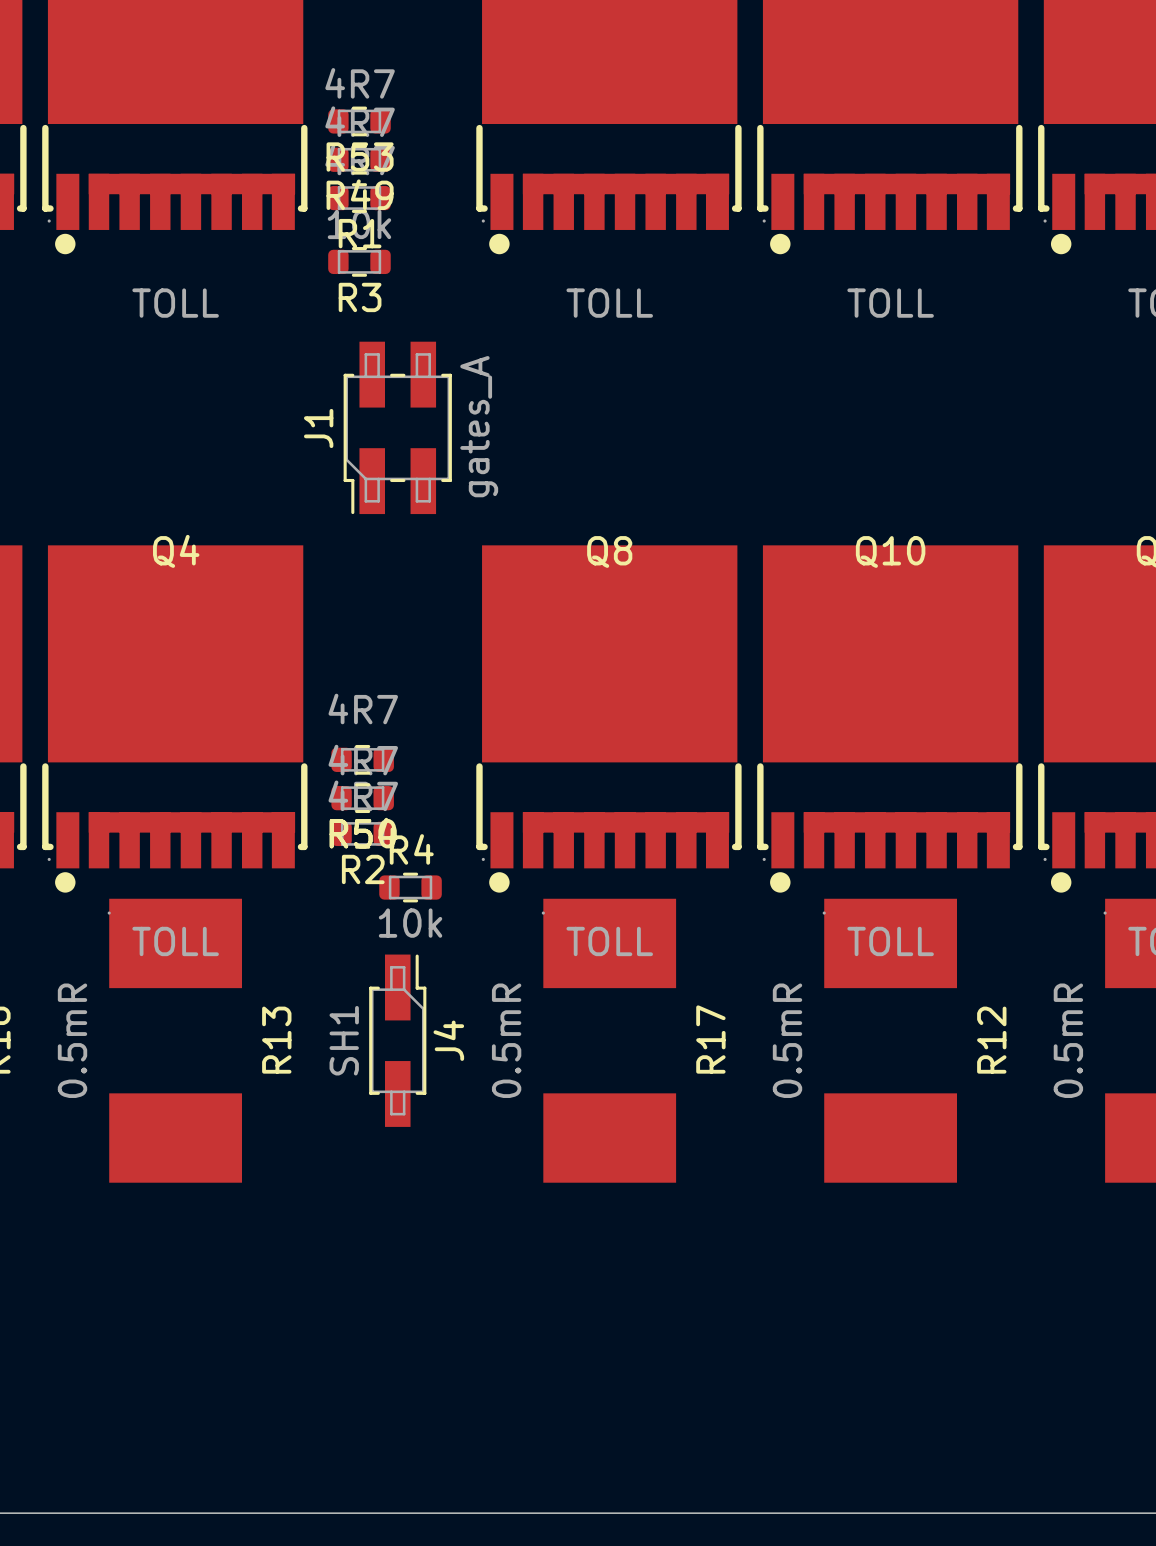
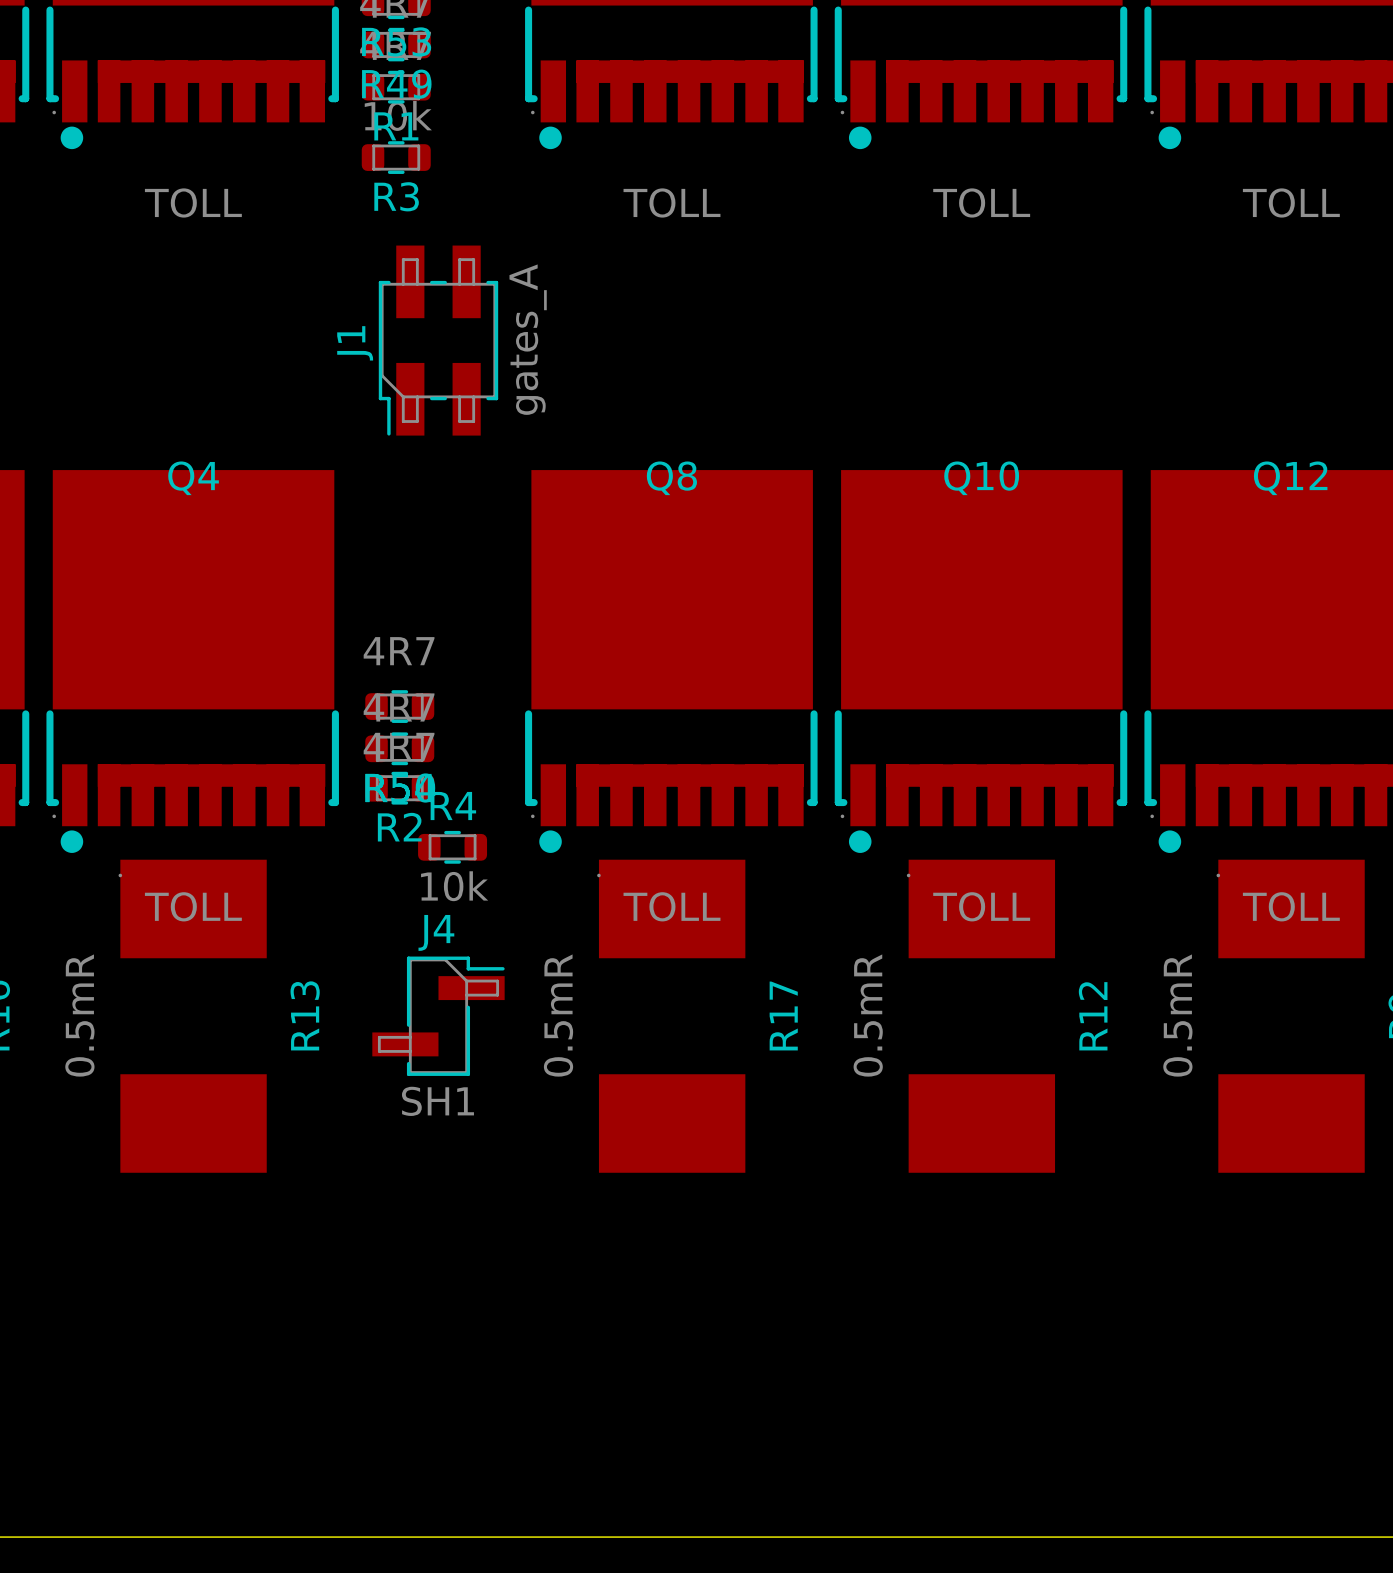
J4 footprint: [369, 954, 427, 1127] -> [372, 956, 505, 1076]
J4 value position: SH1 (344, 1040) -> SH1 (437, 1101)
J4 name position: J4 (448, 1040) -> J4 (436, 932)

